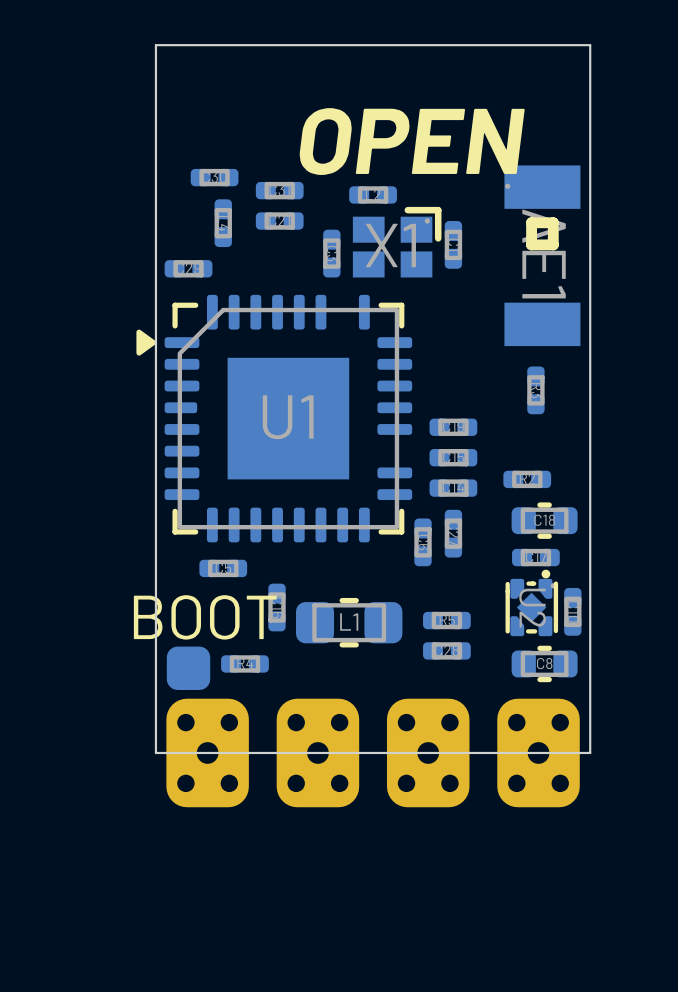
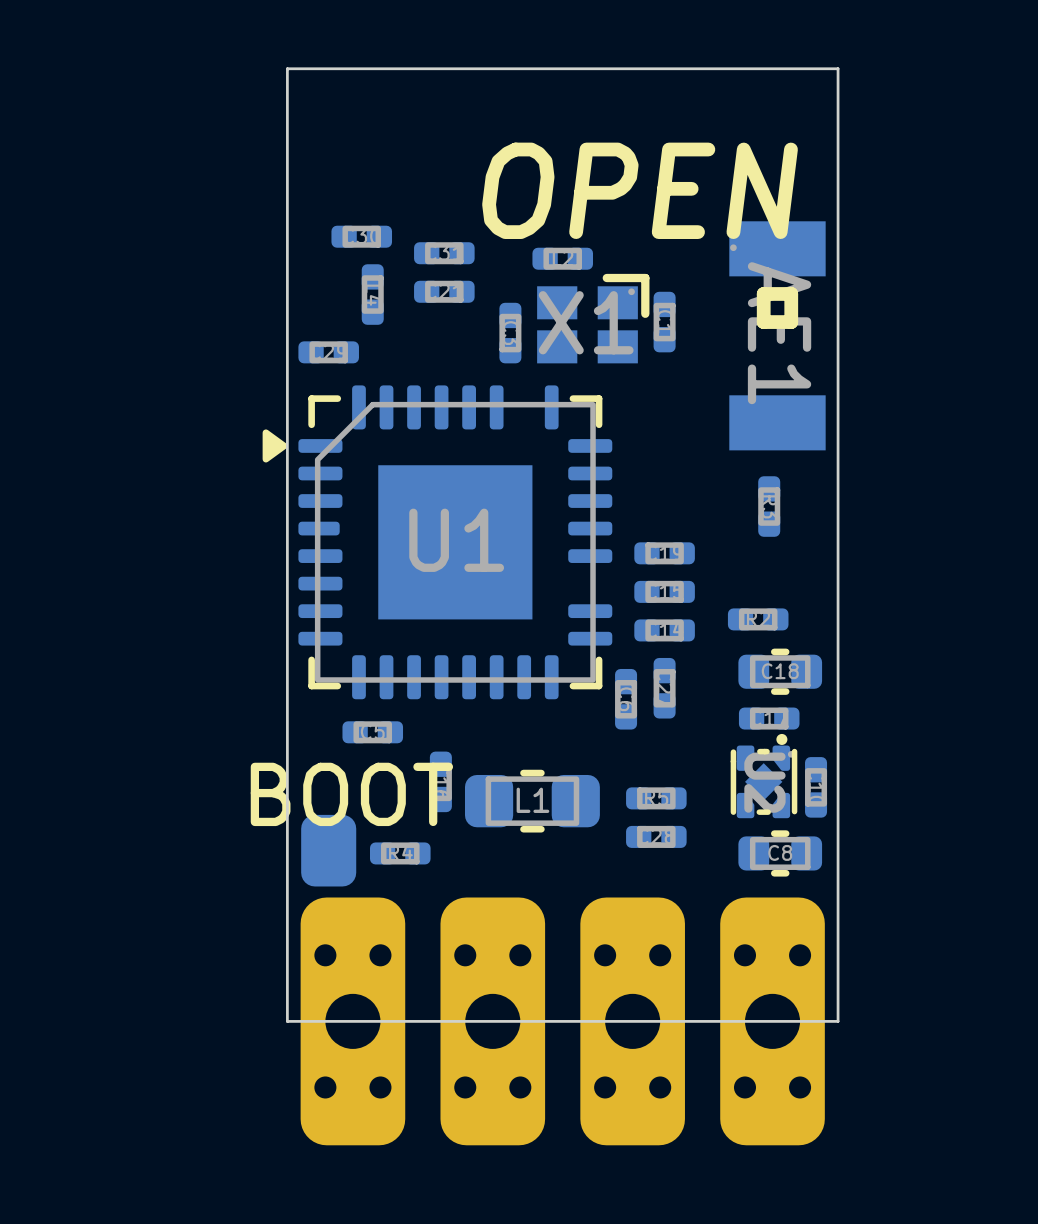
part footprint: [166, 646, 211, 691] -> [301, 814, 357, 887]
part footprint: [166, 698, 249, 808] -> [300, 897, 406, 1146]
part footprint: [276, 698, 360, 808] -> [440, 897, 546, 1146]
part footprint: [386, 698, 470, 808] -> [580, 897, 685, 1146]
part footprint: [497, 698, 580, 808] -> [720, 897, 825, 1146]
board edge: (590, 752) (155, 752) -> (838, 966) (838, 1021) (287, 1021) (287, 966)

